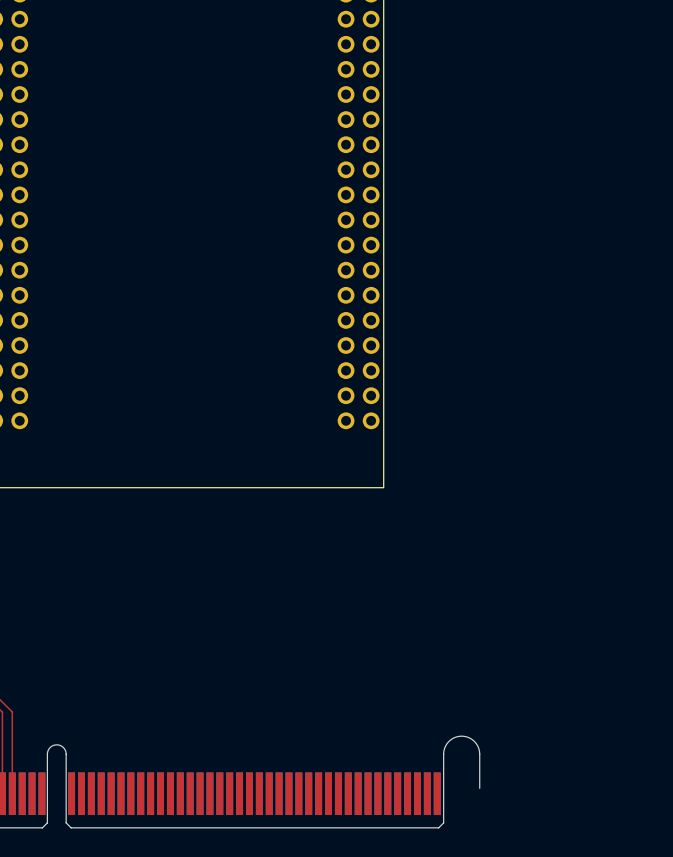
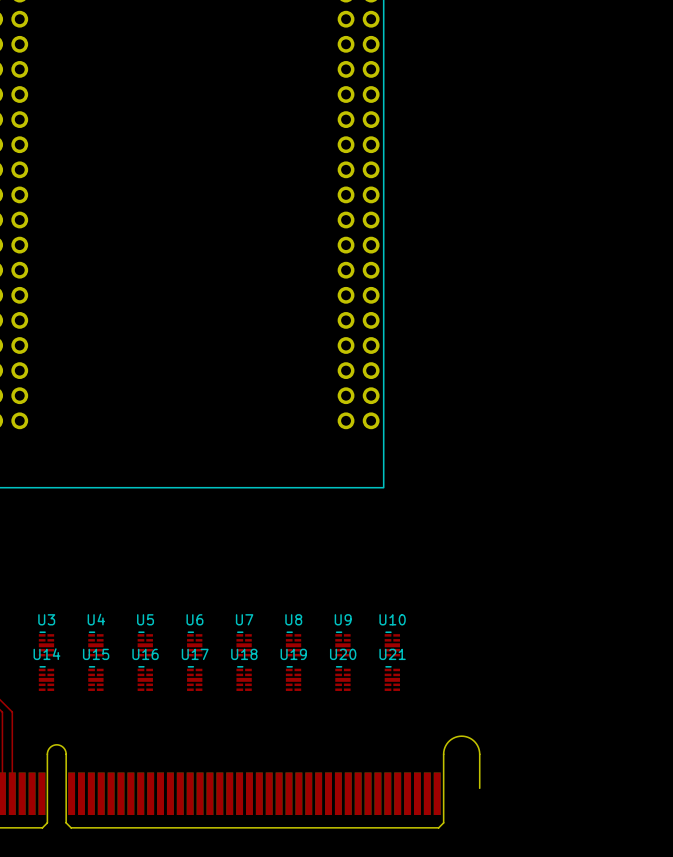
U3: none -> (46, 644)
U4: none -> (95, 644)
U5: none -> (145, 644)
U6: none -> (194, 644)
U7: none -> (244, 644)
U8: none -> (293, 644)
U9: none -> (342, 644)
U10: none -> (392, 644)
U14: none -> (46, 678)
U15: none -> (95, 678)
U16: none -> (145, 678)
U17: none -> (194, 678)
U18: none -> (244, 678)
U19: none -> (293, 678)
U20: none -> (342, 678)
U21: none -> (392, 678)

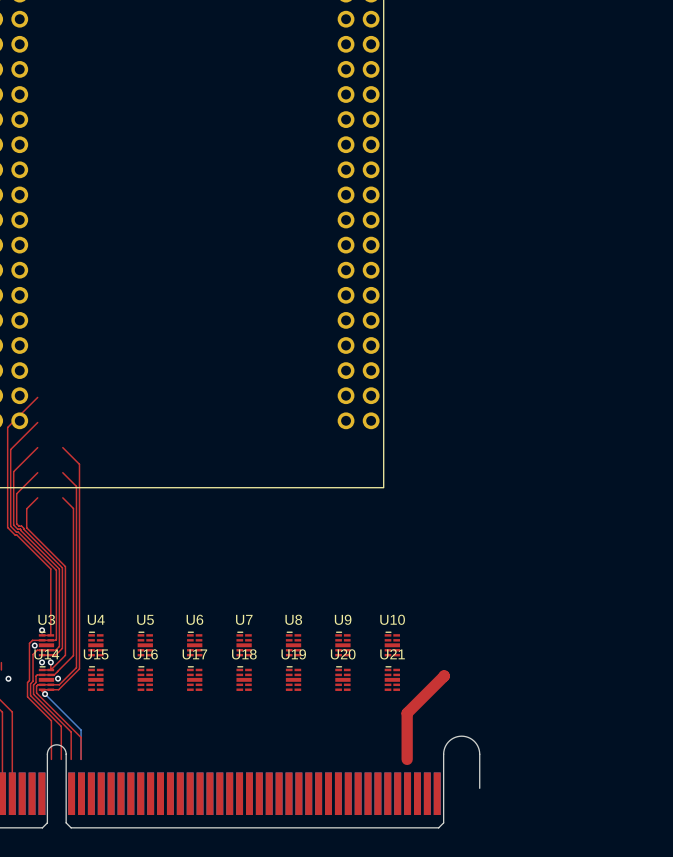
top track: none -> (37, 397) (7, 427) (7, 527) (50, 568) (50, 635) (42, 635)
top track: none -> (37, 422) (10, 449) (10, 526) (56, 570) (56, 639) (32, 640) (29, 643) (29, 680) (27, 682) (27, 696) (51, 720) (51, 759)
top track: none -> (37, 447) (13, 471) (13, 525) (20, 529) (59, 569) (59, 646) (55, 650) (37, 650) (33, 654) (33, 681) (30, 683) (30, 695) (61, 726) (61, 759)
top track: none -> (62, 447) (79, 464) (79, 668) (58, 689) (42, 689) (45, 694)
top track: none -> (37, 472) (16, 493) (16, 523) (21, 526) (62, 567) (62, 648) (55, 655) (42, 655)
top track: none -> (62, 472) (76, 486) (76, 667) (59, 684) (38, 684) (36, 693) (81, 737) (81, 759)
top track: none -> (37, 497) (26, 508) (26, 527) (65, 566) (65, 655) (50, 669) (42, 669)
top track: none -> (62, 497) (73, 508) (73, 655) (57, 671)
via: none -> (42, 630)
via: none -> (34, 645)
top track: none -> (1, 662) (1, 669)
via: none -> (42, 662)
top track: none -> (50, 662) (50, 669)
via: none -> (50, 662)
top track: none -> (57, 671) (54, 674) (37, 674) (33, 685) (33, 694) (71, 731) (71, 759)
top track: none -> (444, 675) (407, 713) (407, 759)
via: none -> (8, 678)
via: none -> (58, 678)
bottom track: none -> (45, 694) (81, 730) (81, 759)
via: none -> (45, 694)

